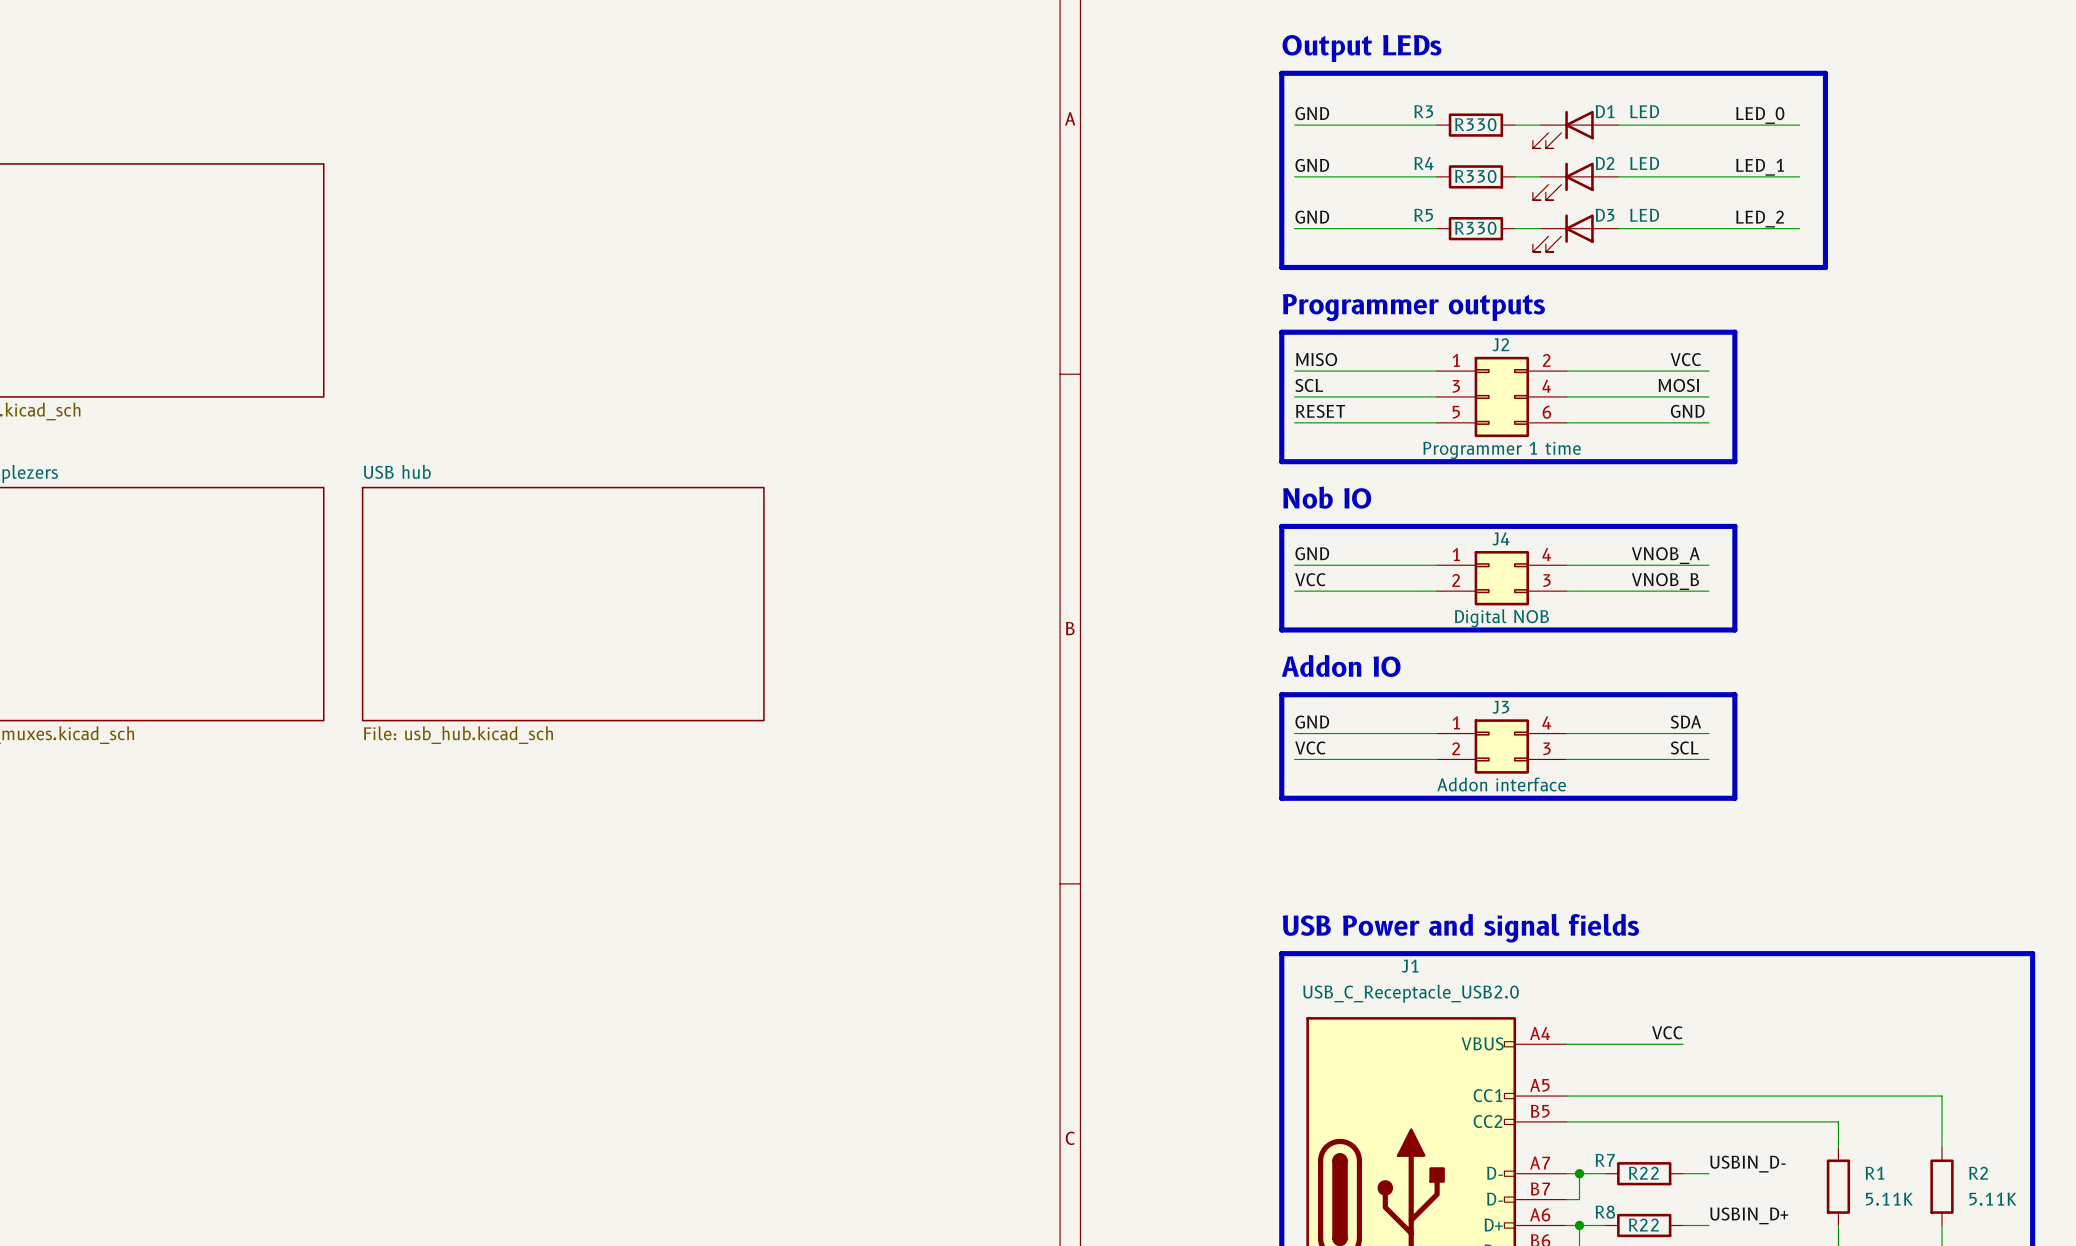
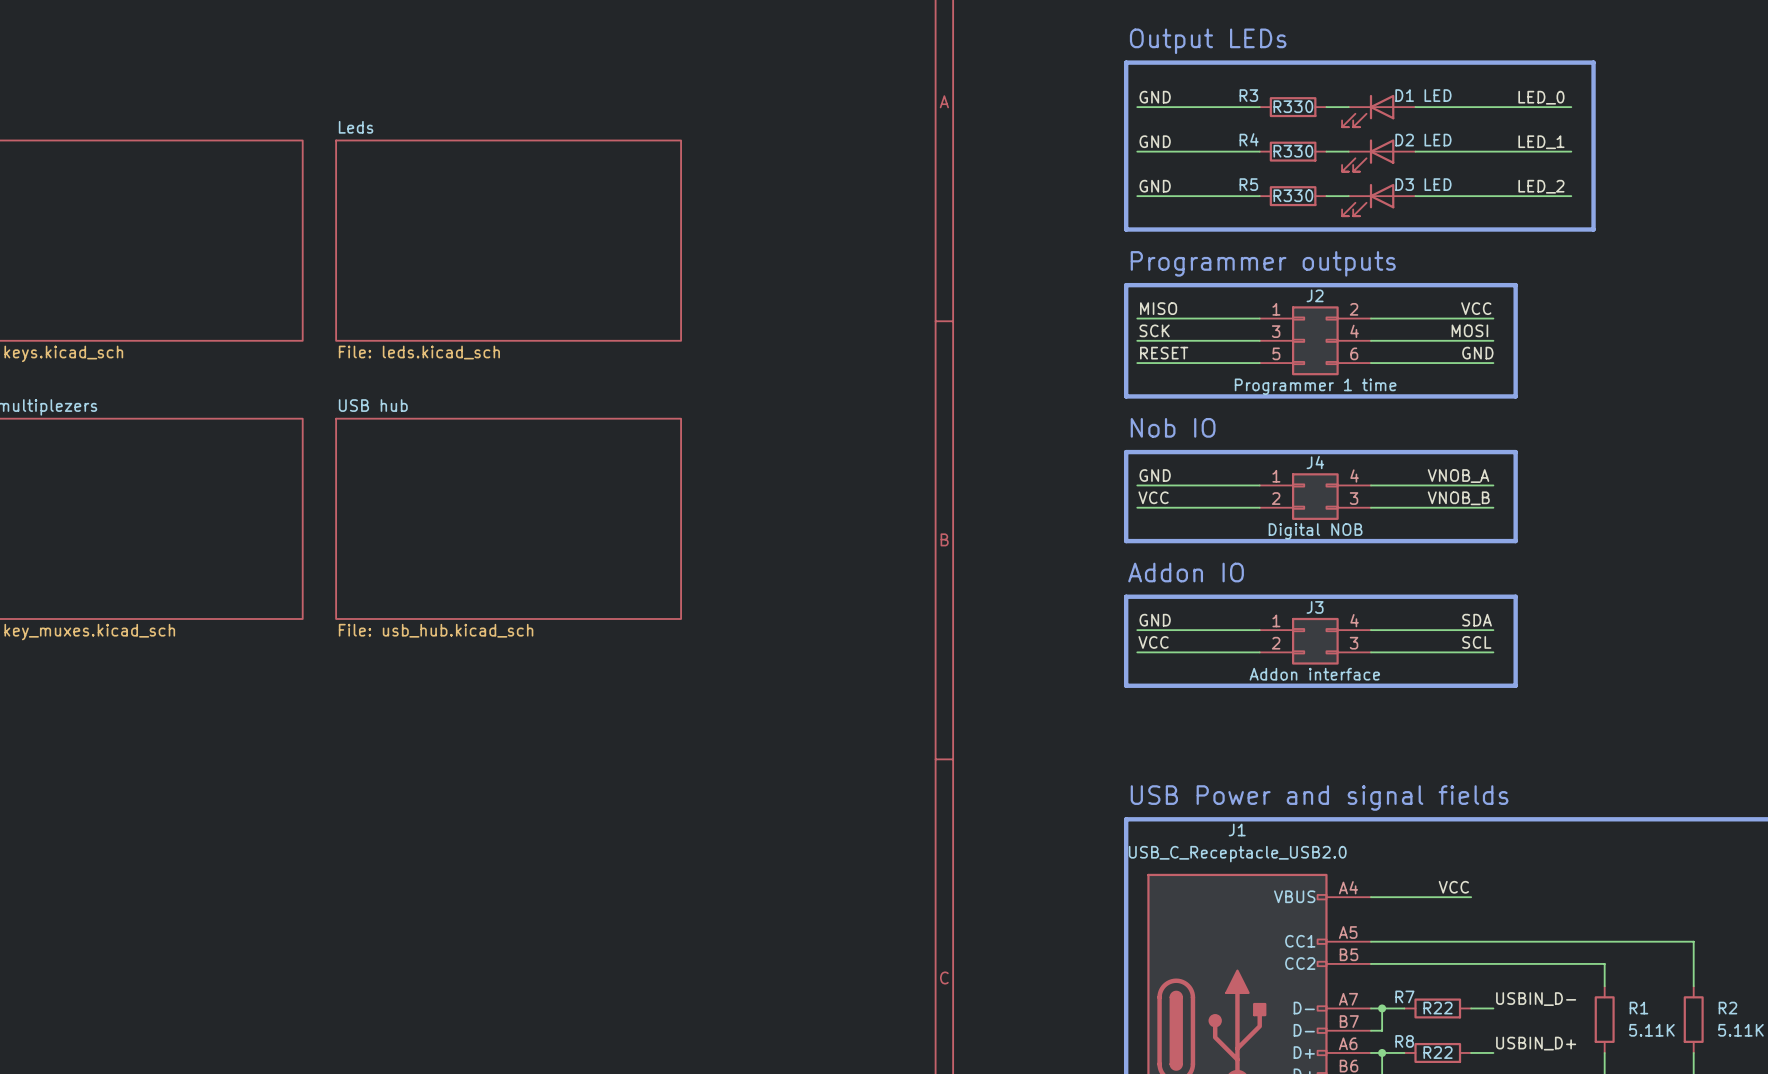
sheet Leds: none -> File: leds.kicad_sch (508, 240)
label: SCL (1309, 385) -> SCK (1154, 330)

